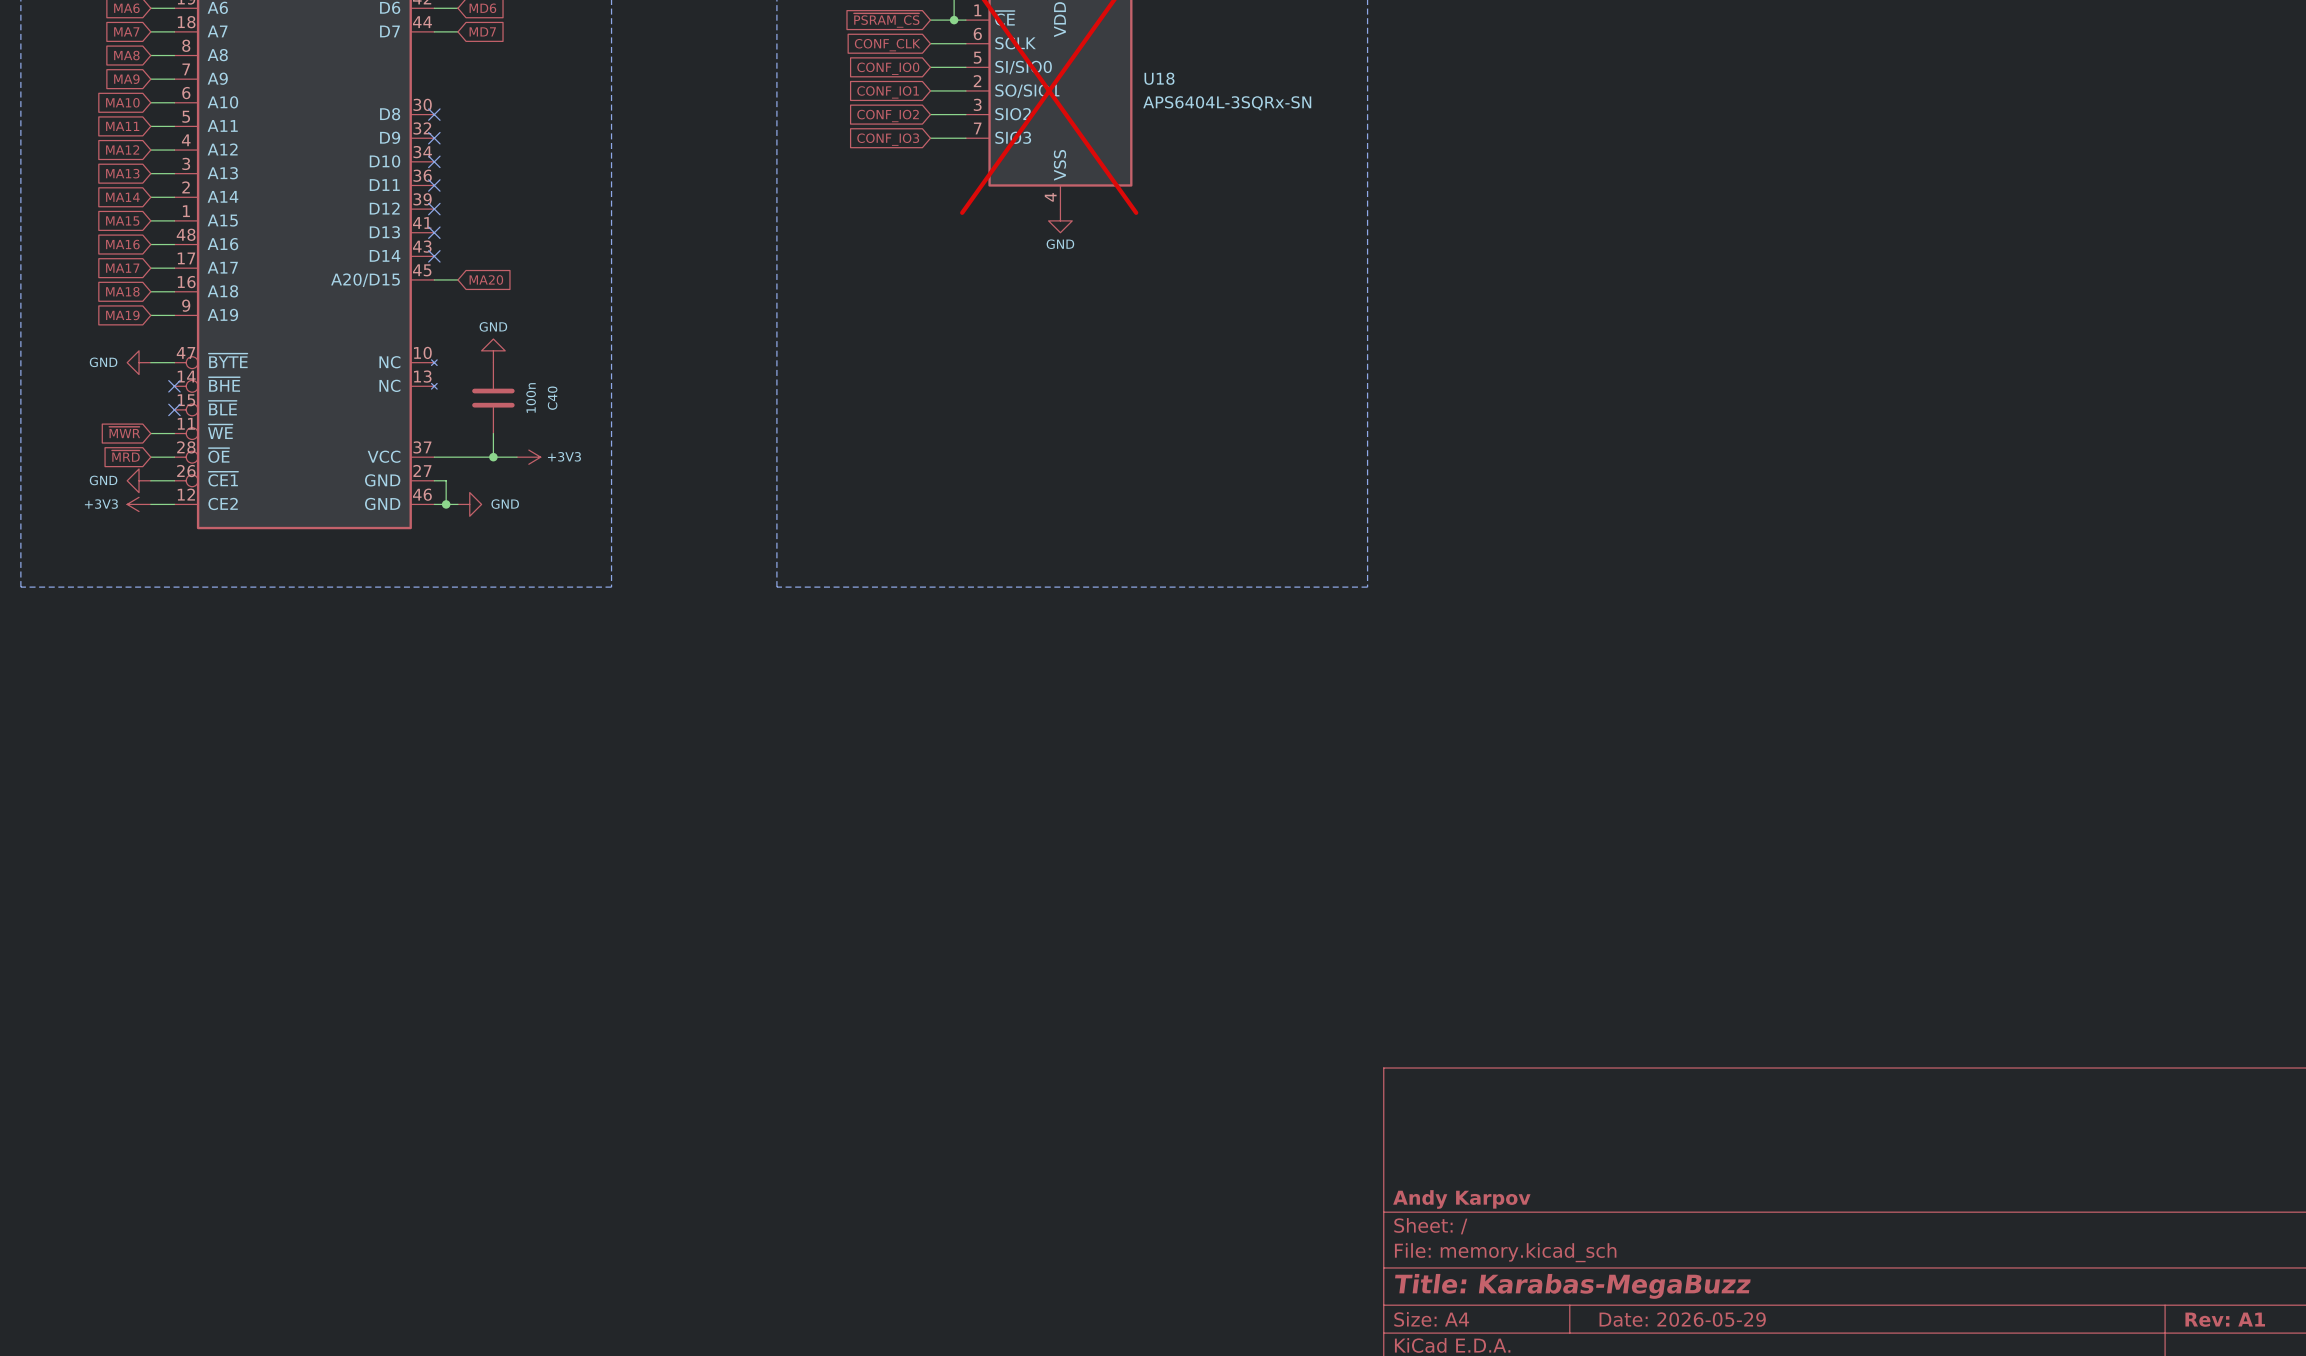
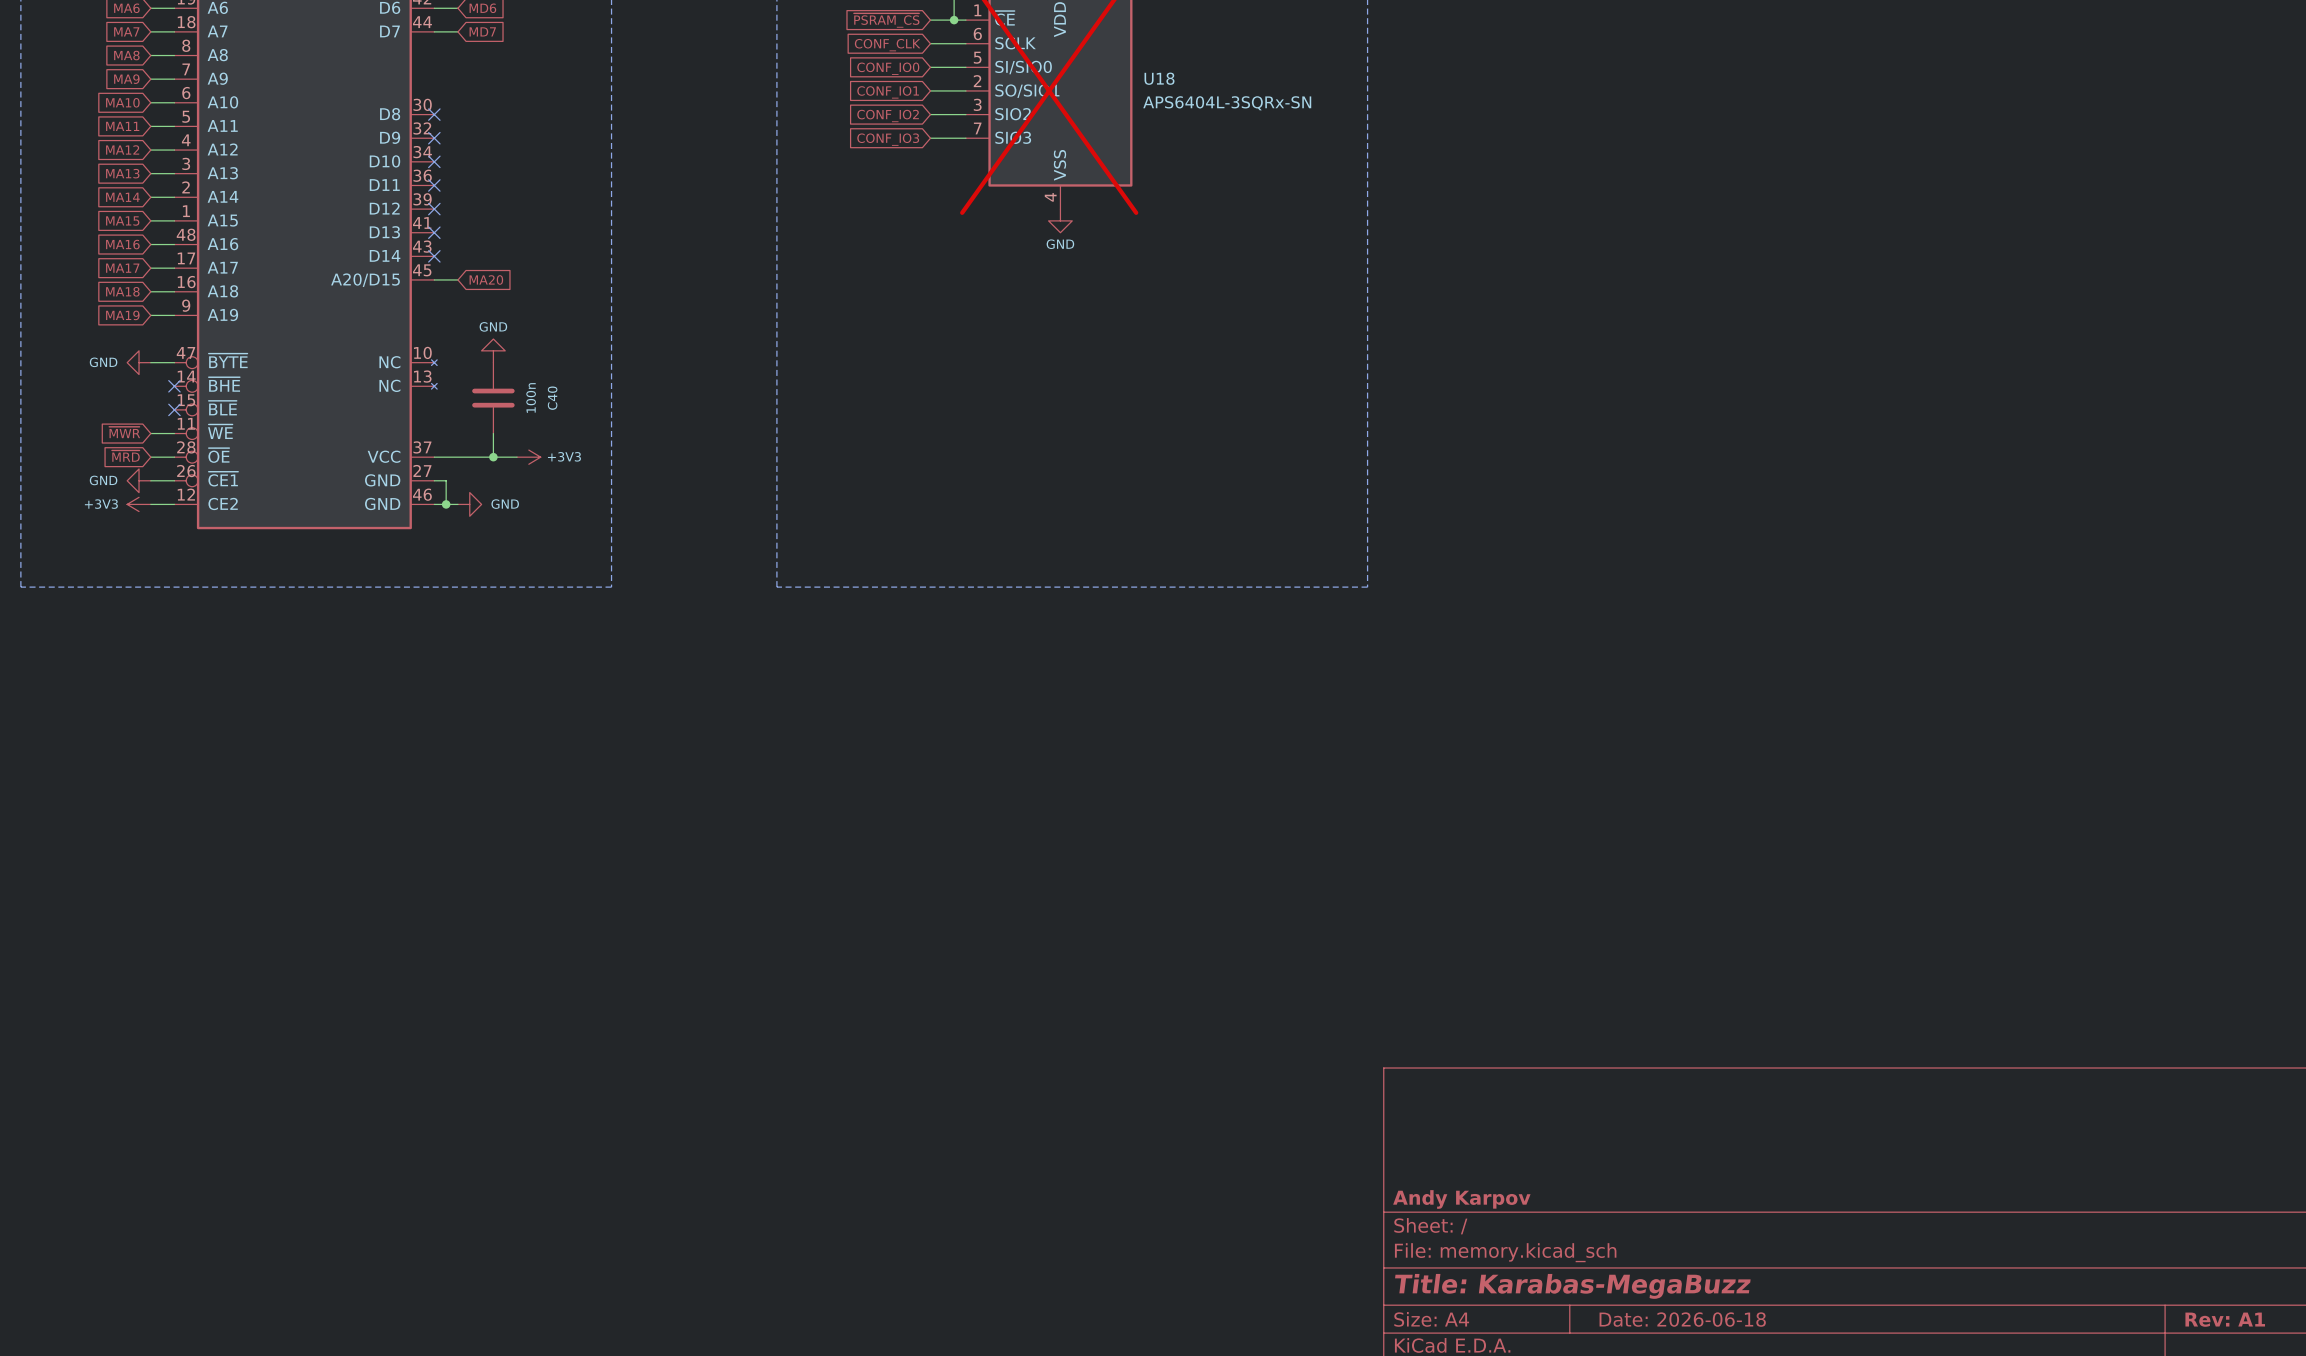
title block: Date: 2026-05-29 (1682, 1319) -> Date: 2026-06-18 (1682, 1319)

